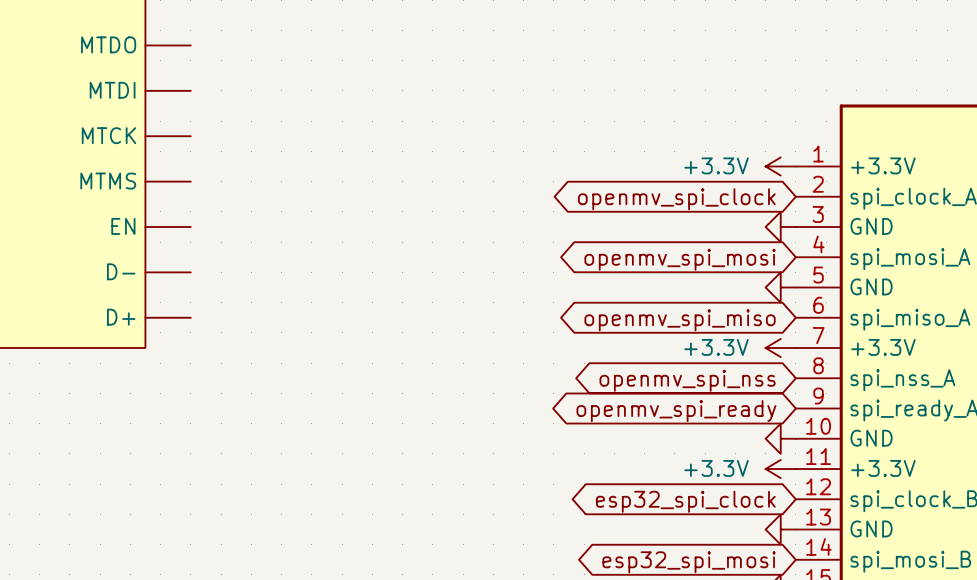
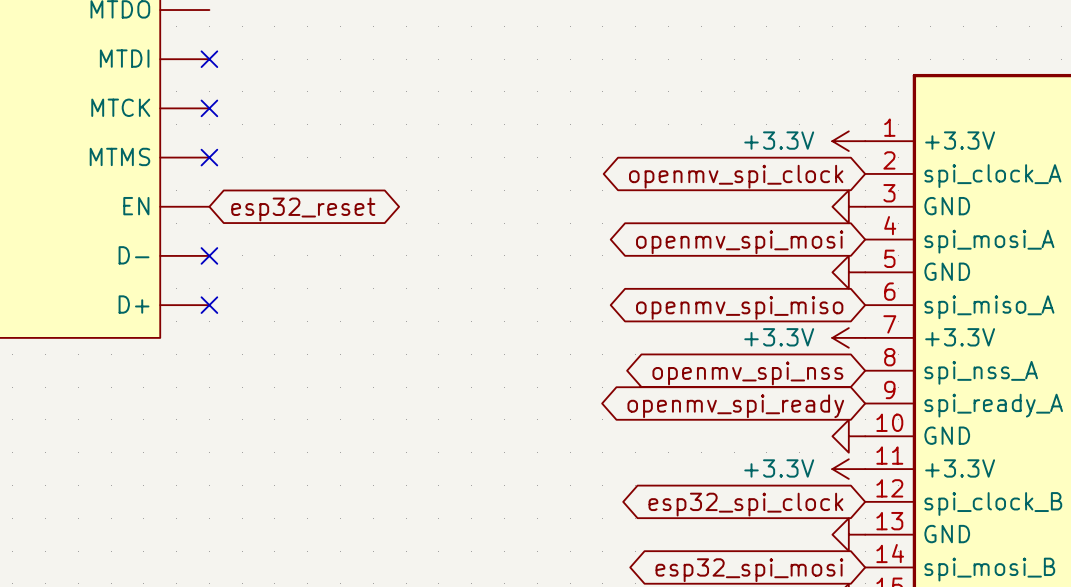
no-connect mark: none -> (209, 59)
no-connect mark: none -> (209, 108)
no-connect mark: none -> (209, 157)
global label: none -> esp32_reset (303, 209)
no-connect mark: none -> (209, 255)
no-connect mark: none -> (209, 305)

